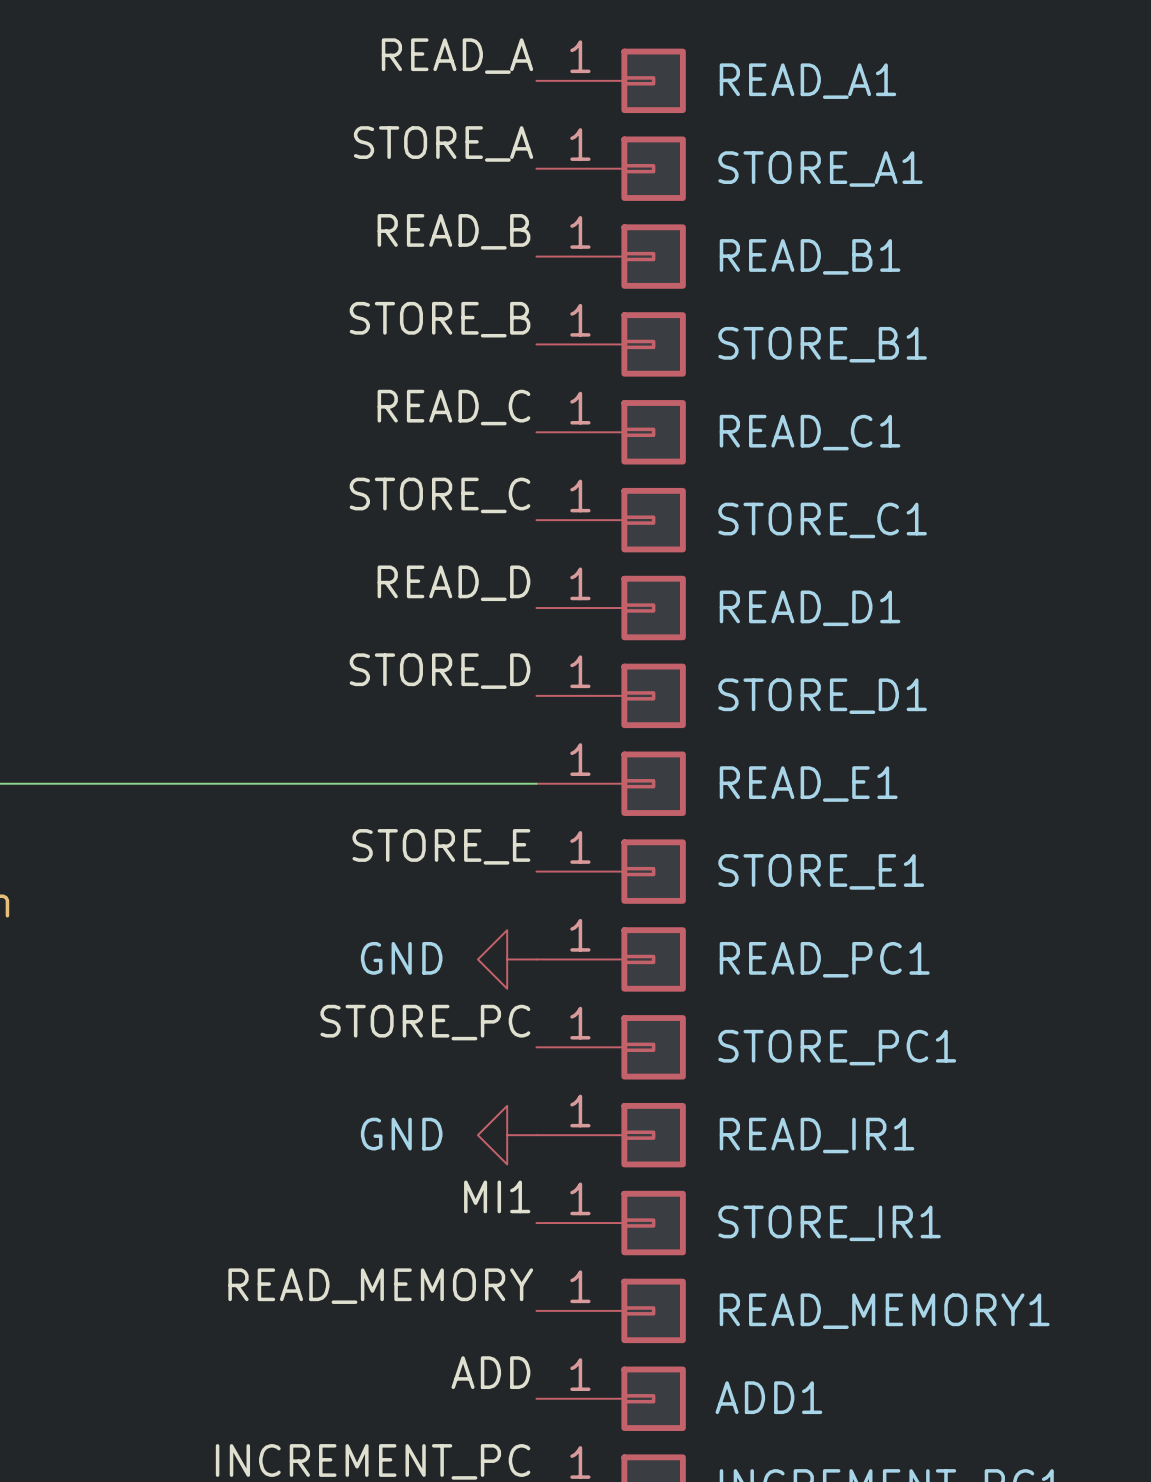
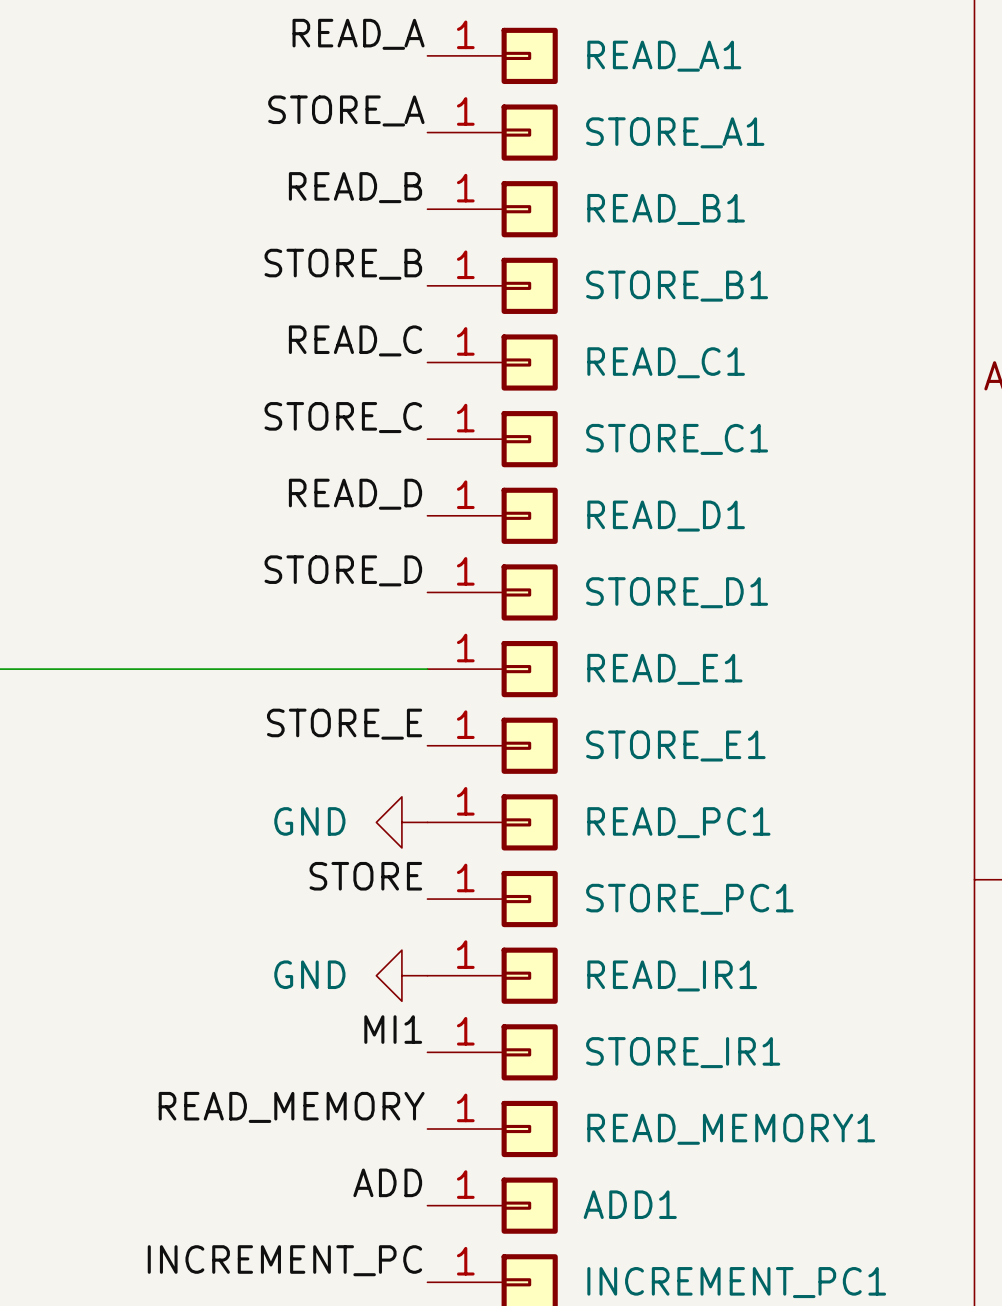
label: STORE_PC (425, 1022) -> STORE (365, 876)

